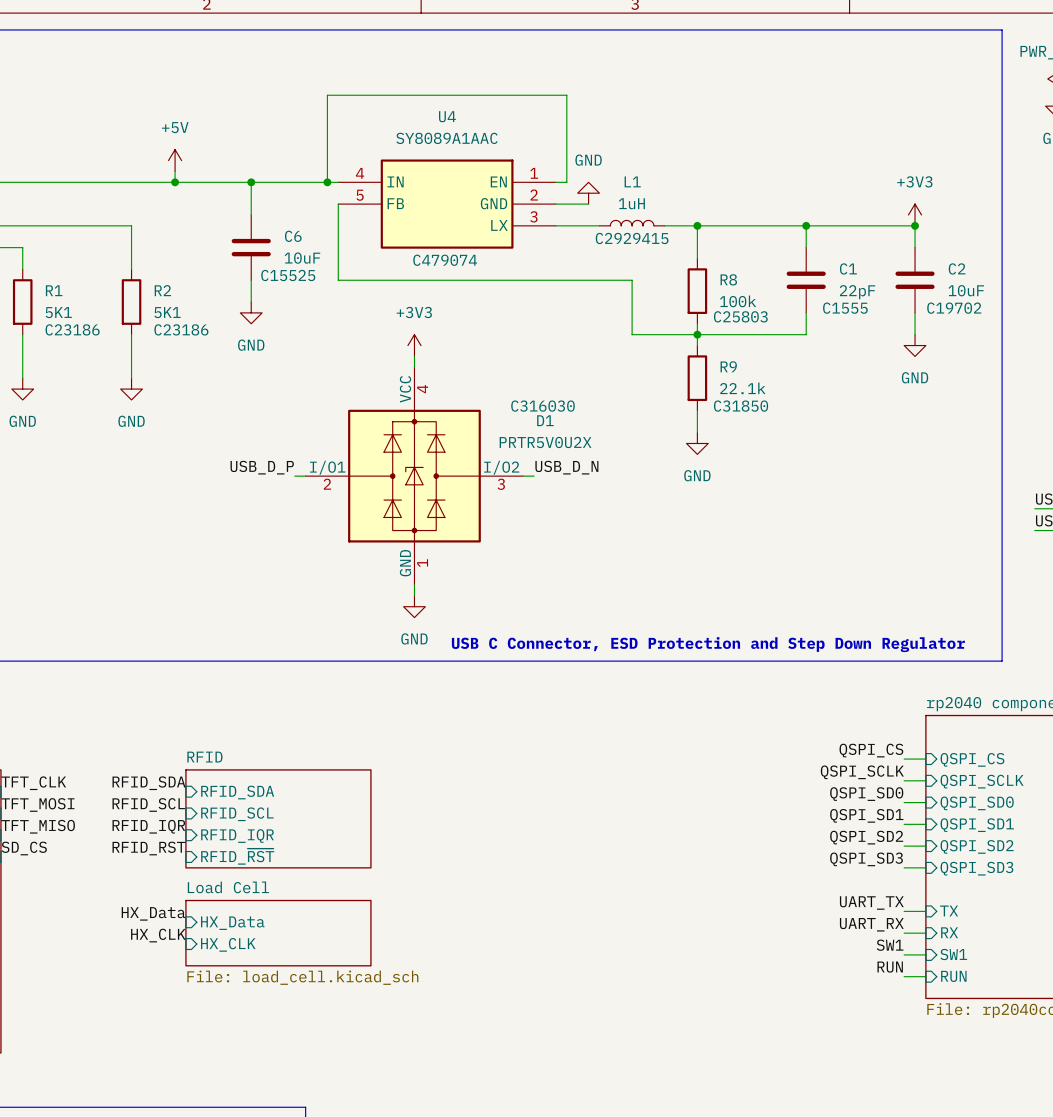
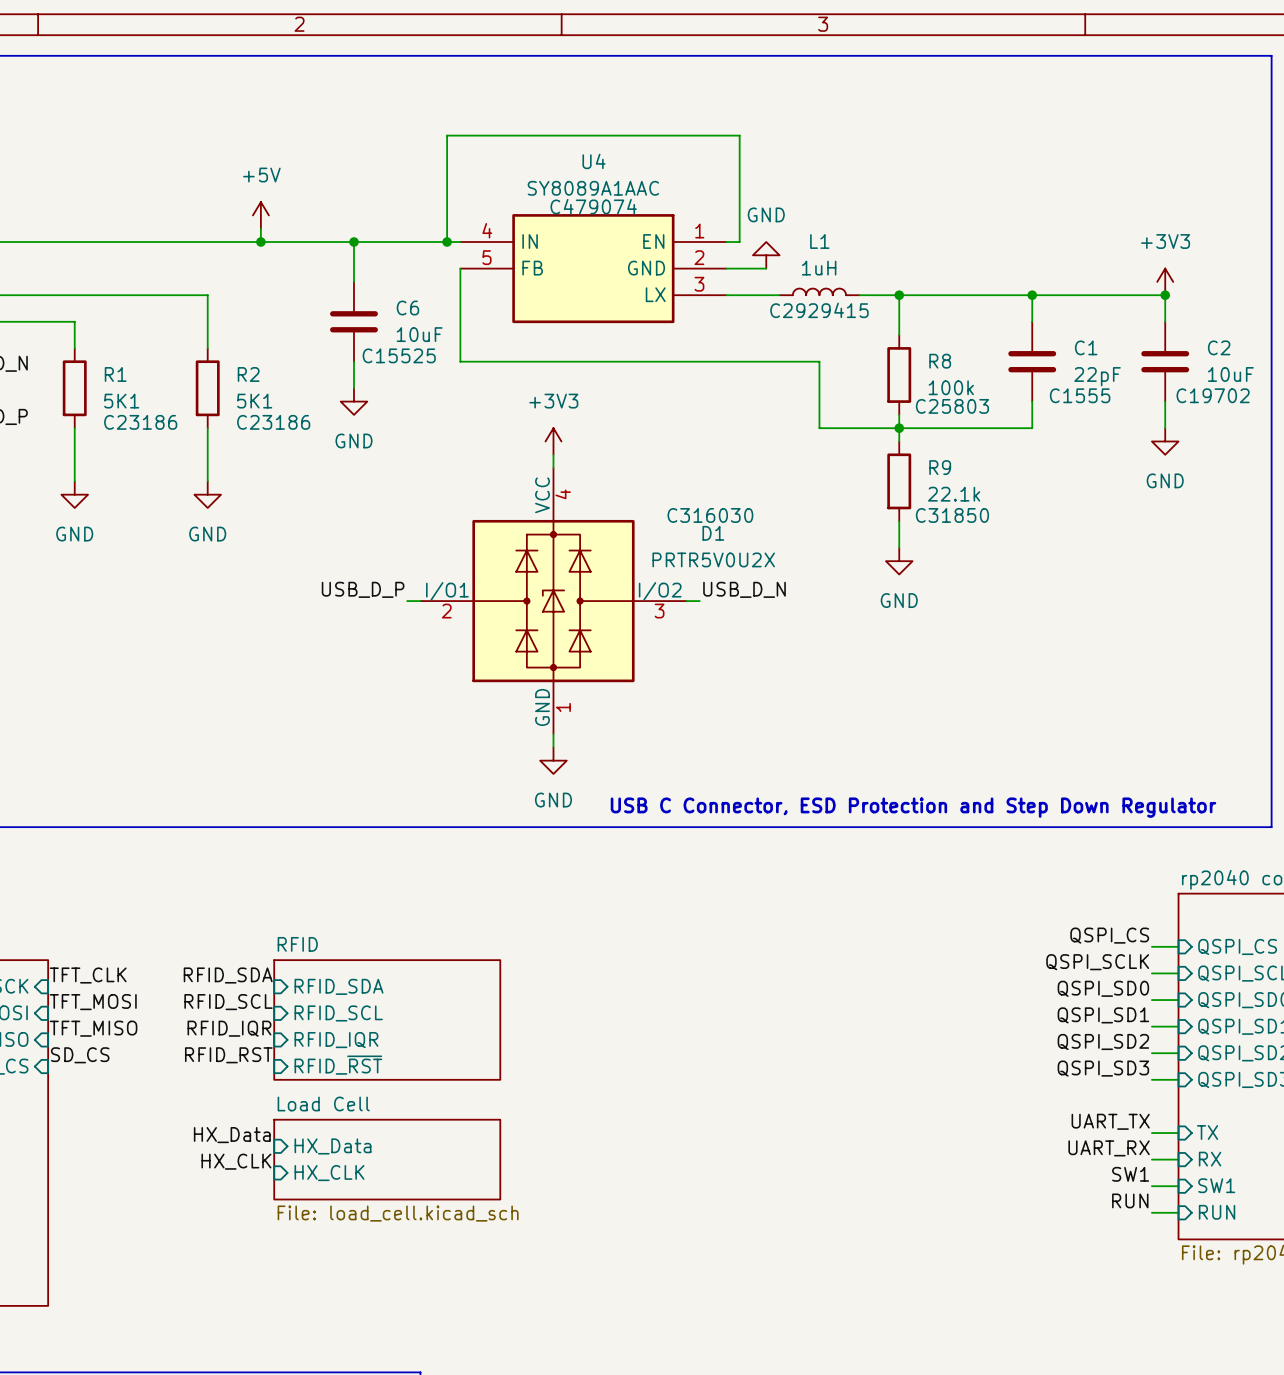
U4 text position: C479074 (445, 260) -> C479074 (593, 206)

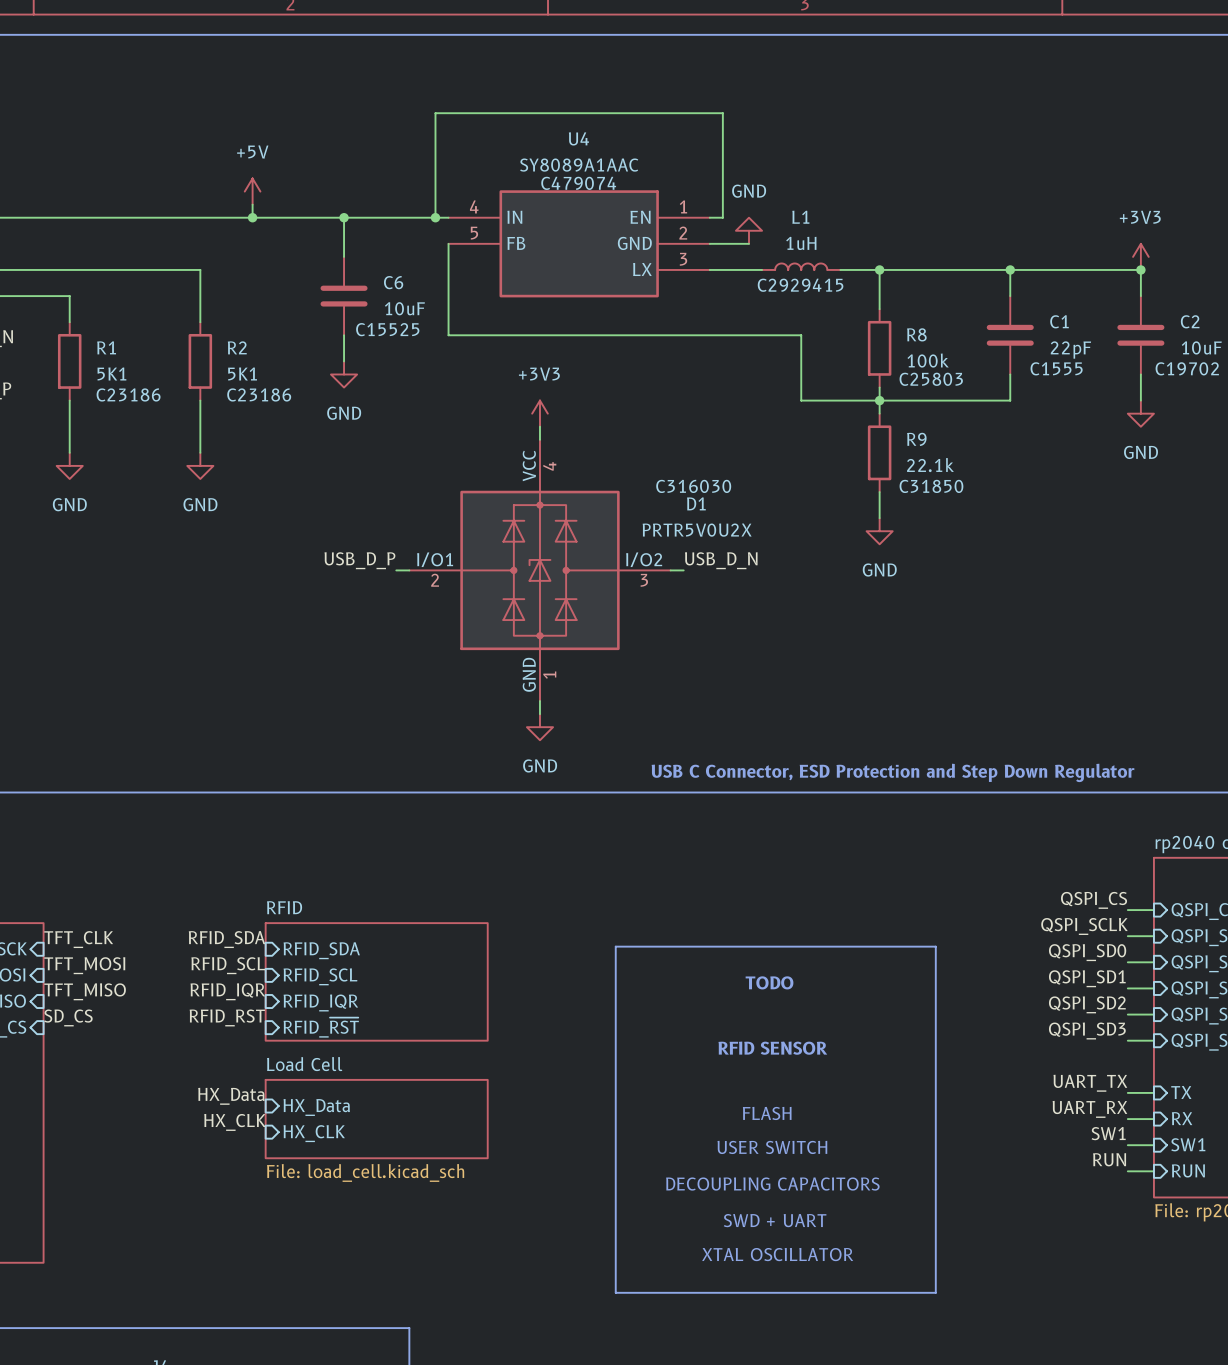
line: none -> (615, 946) (935, 946) (935, 1292) (615, 1292) (615, 946)
text: none -> TODO (769, 982)
text: none -> RFID SENSOR (772, 1048)
text: none -> FLASH (767, 1113)
text: none -> USER SWITCH (772, 1147)
text: none -> DECOUPLING CAPACITORS (772, 1184)
text: none -> SWD + UART (775, 1220)
text: none -> XTAL OSCILLATOR (777, 1254)

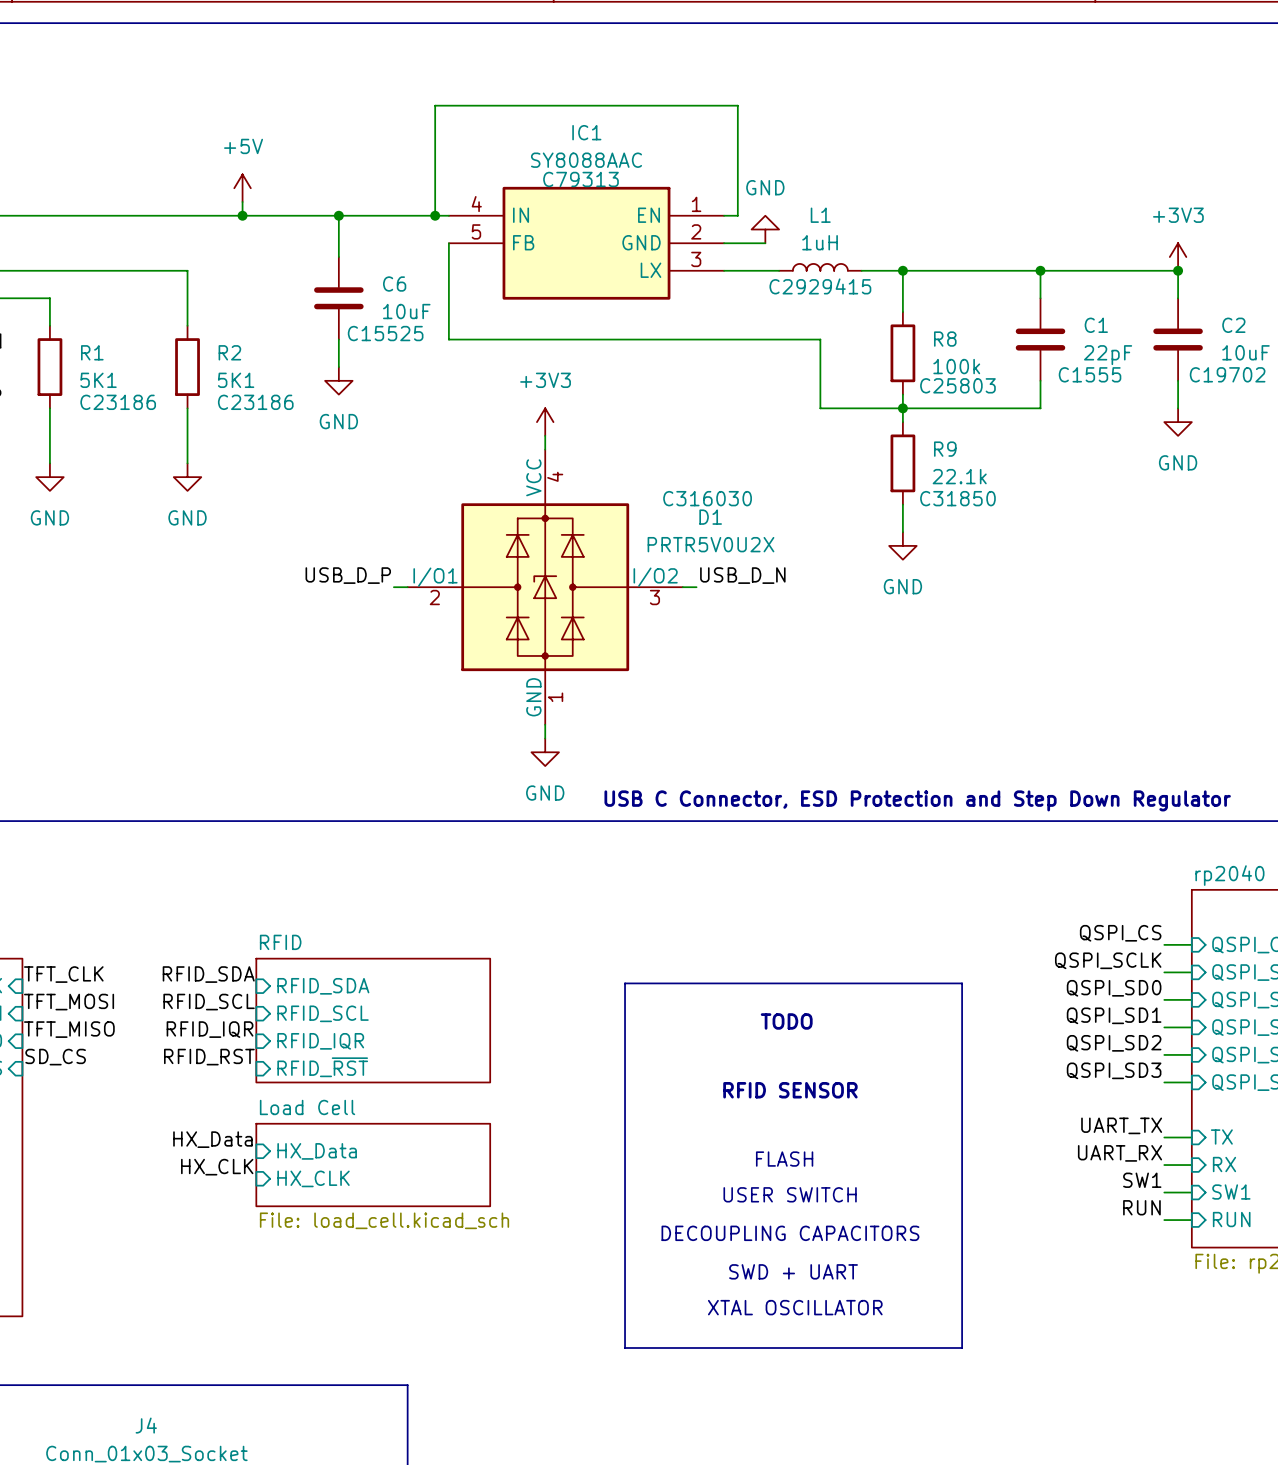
U4 name: U4 (578, 138) -> IC1 (586, 132)
U4 value: SY8089A1AAC (579, 165) -> SY8088AAC (586, 160)
U4 text: none -> C79313 (580, 179)
U4 text: C479074 (578, 183) -> none

